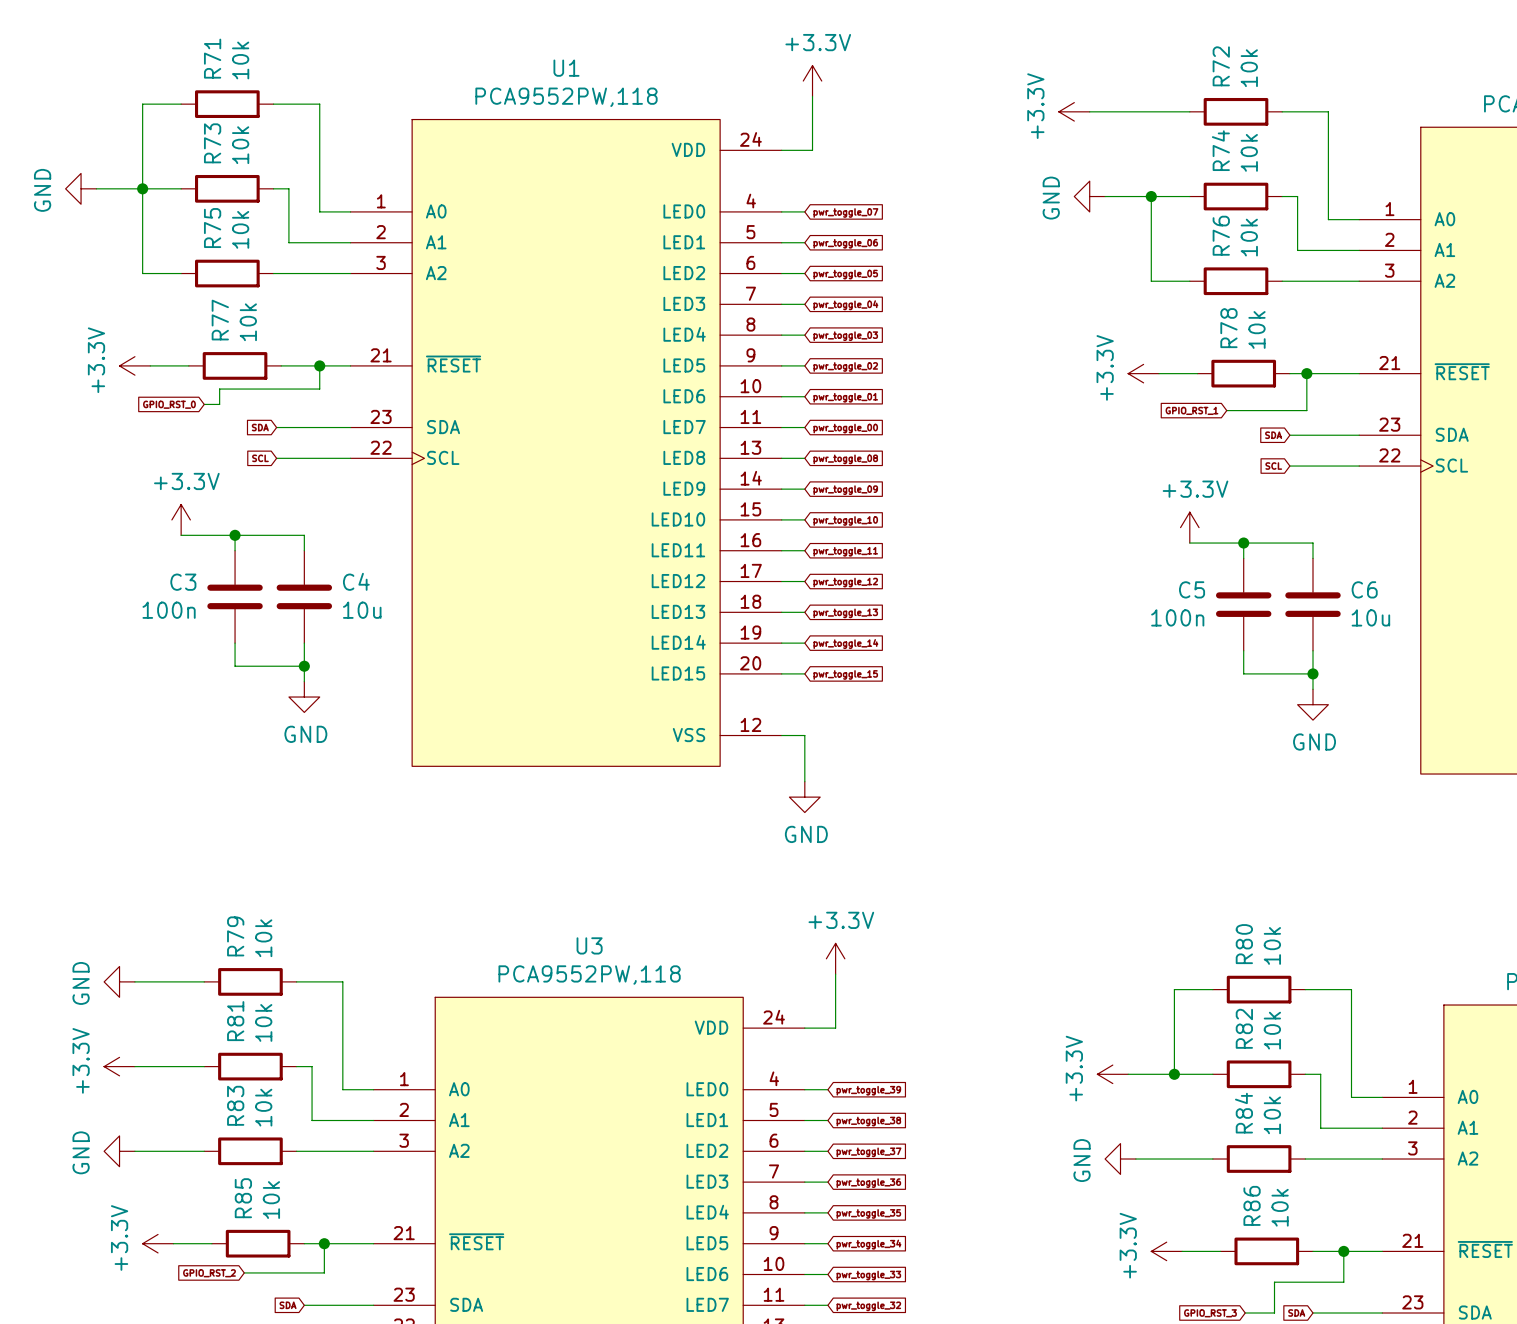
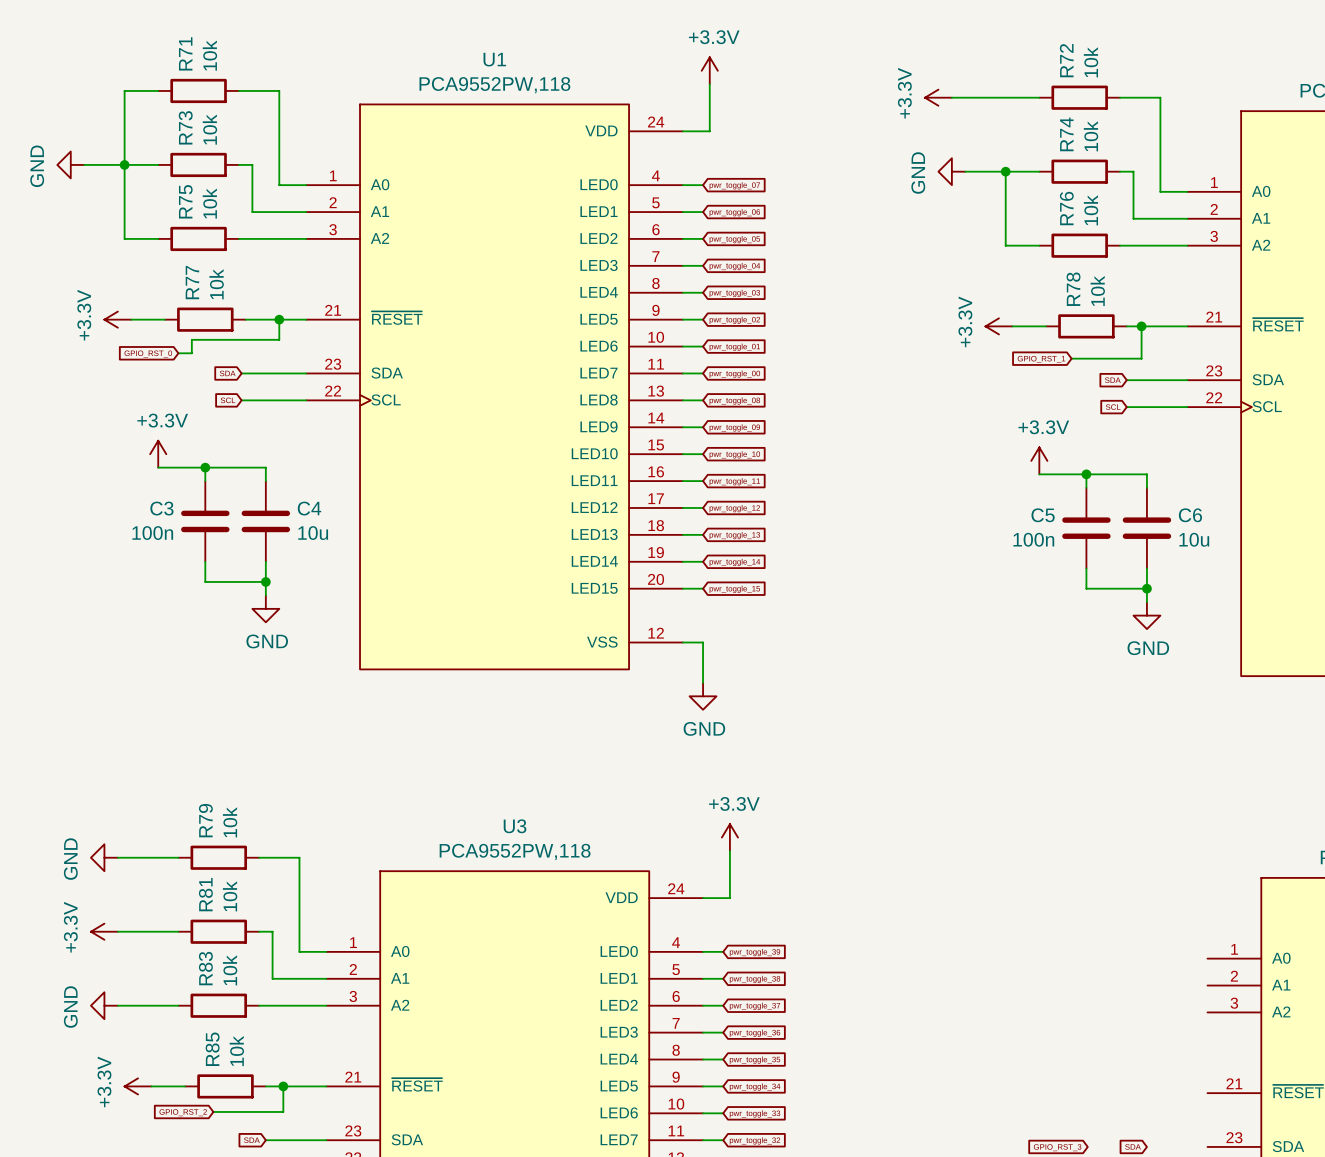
wire: (1212, 989) (1174, 989) (1174, 1074) -> none
R80: 10k (1259, 989) -> none
wire: (1305, 989) (1351, 989) (1351, 1097) (1382, 1097) -> none
power symbol: +3.3V (1112, 1074) -> none
wire: (1128, 1074) (1212, 1074) -> none
junction: (1174, 1074) -> none
R82: 10k (1259, 1074) -> none
wire: (1305, 1074) (1320, 1074) (1320, 1128) (1382, 1128) -> none
power symbol: GND (1120, 1159) -> none
wire: (1135, 1159) (1212, 1159) -> none
R84: 10k (1259, 1159) -> none
wire: (1305, 1159) (1382, 1159) -> none
power symbol: +3.3V (1166, 1251) -> none
wire: (1182, 1251) (1220, 1251) -> none
R86: 10k (1266, 1251) -> none
wire: (1313, 1251) (1382, 1251) -> none
wire: (1343, 1251) (1343, 1282) (1274, 1282) (1274, 1313) (1245, 1313) -> none
junction: (1343, 1251) -> none
wire: (1313, 1313) (1382, 1313) -> none

